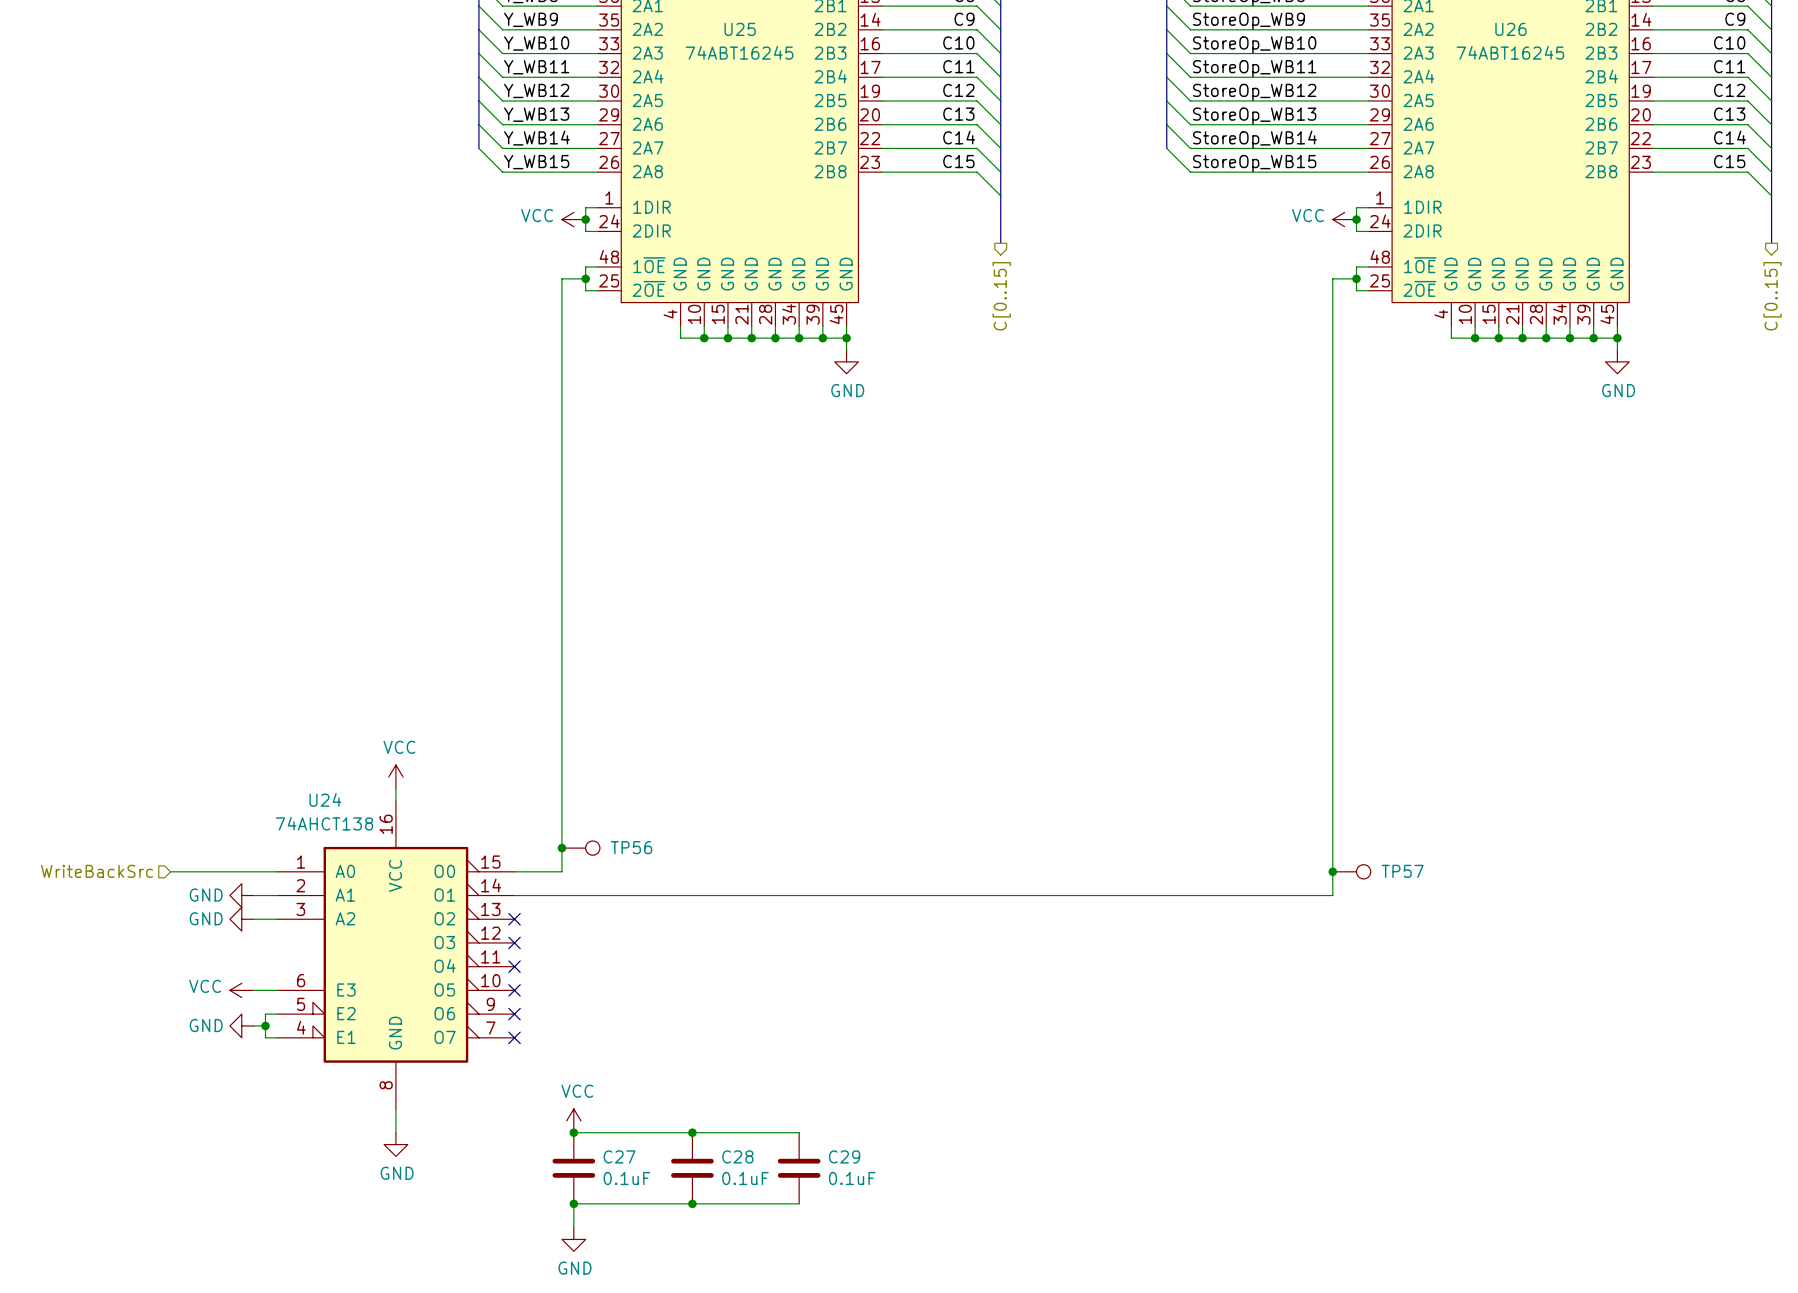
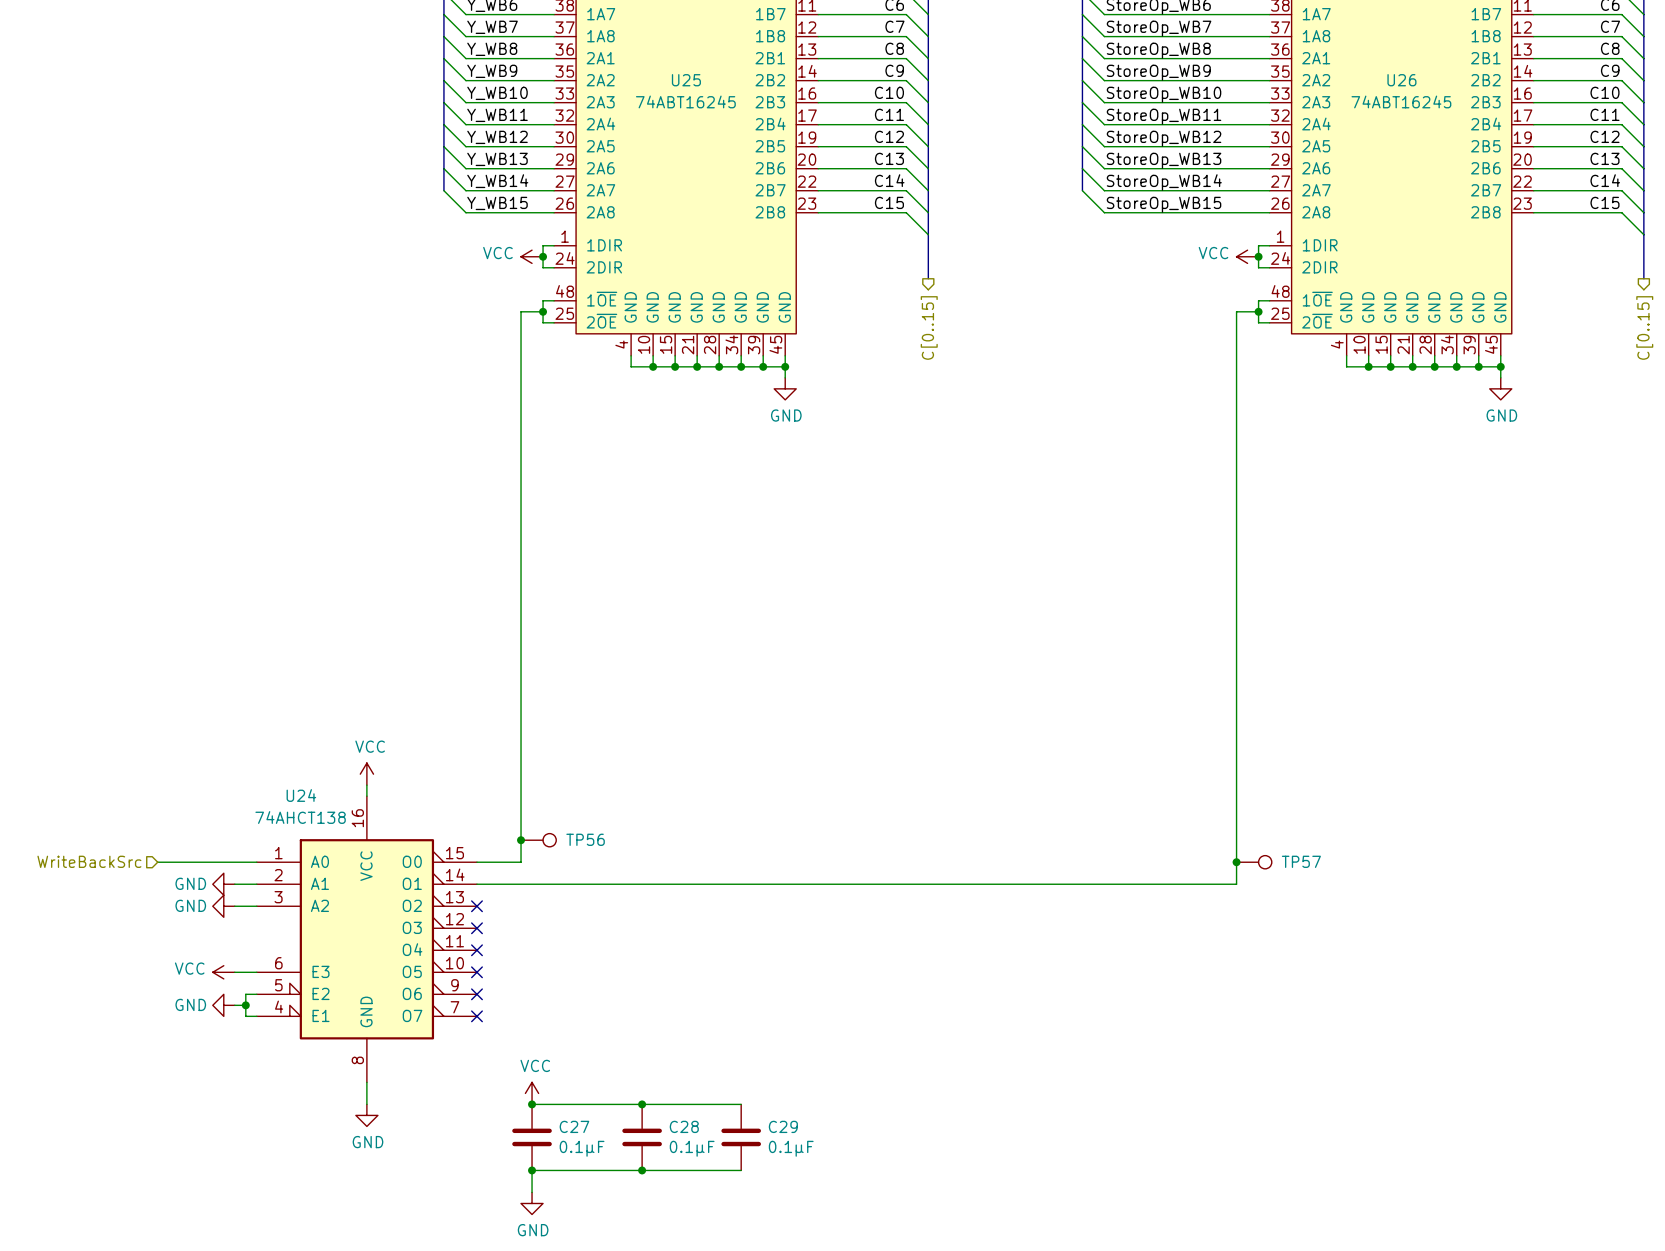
C27 value: 0.1uF (626, 1178) -> 0.1µF (582, 1148)
C28 value: 0.1uF (745, 1178) -> 0.1µF (692, 1148)
C29 value: 0.1uF (852, 1178) -> 0.1µF (791, 1148)

